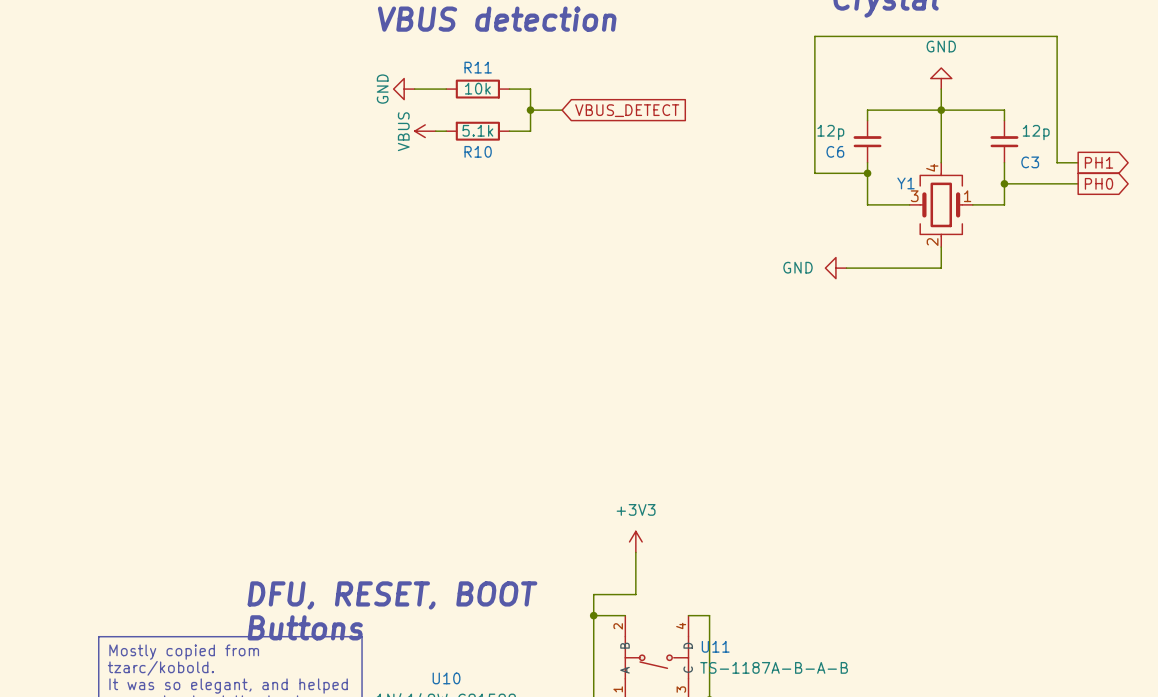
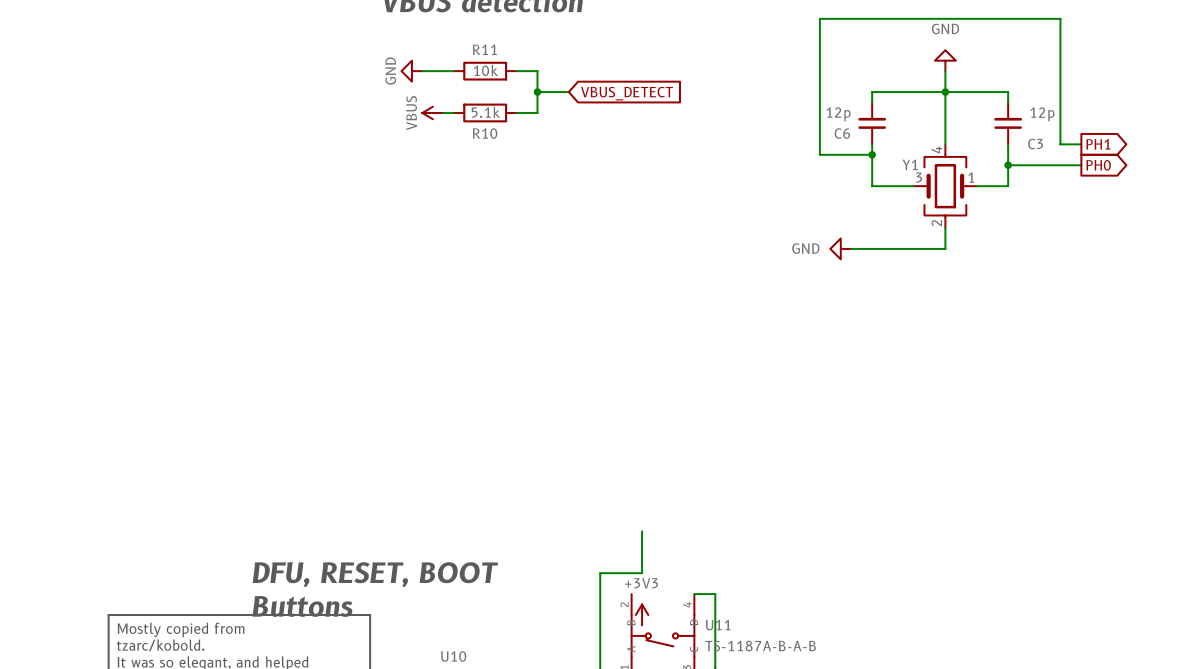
power symbol position: +3V3 (635, 541) -> +3V3 (642, 615)
wire: (593, 615) (625, 615) -> none
junction: (593, 615) -> none

